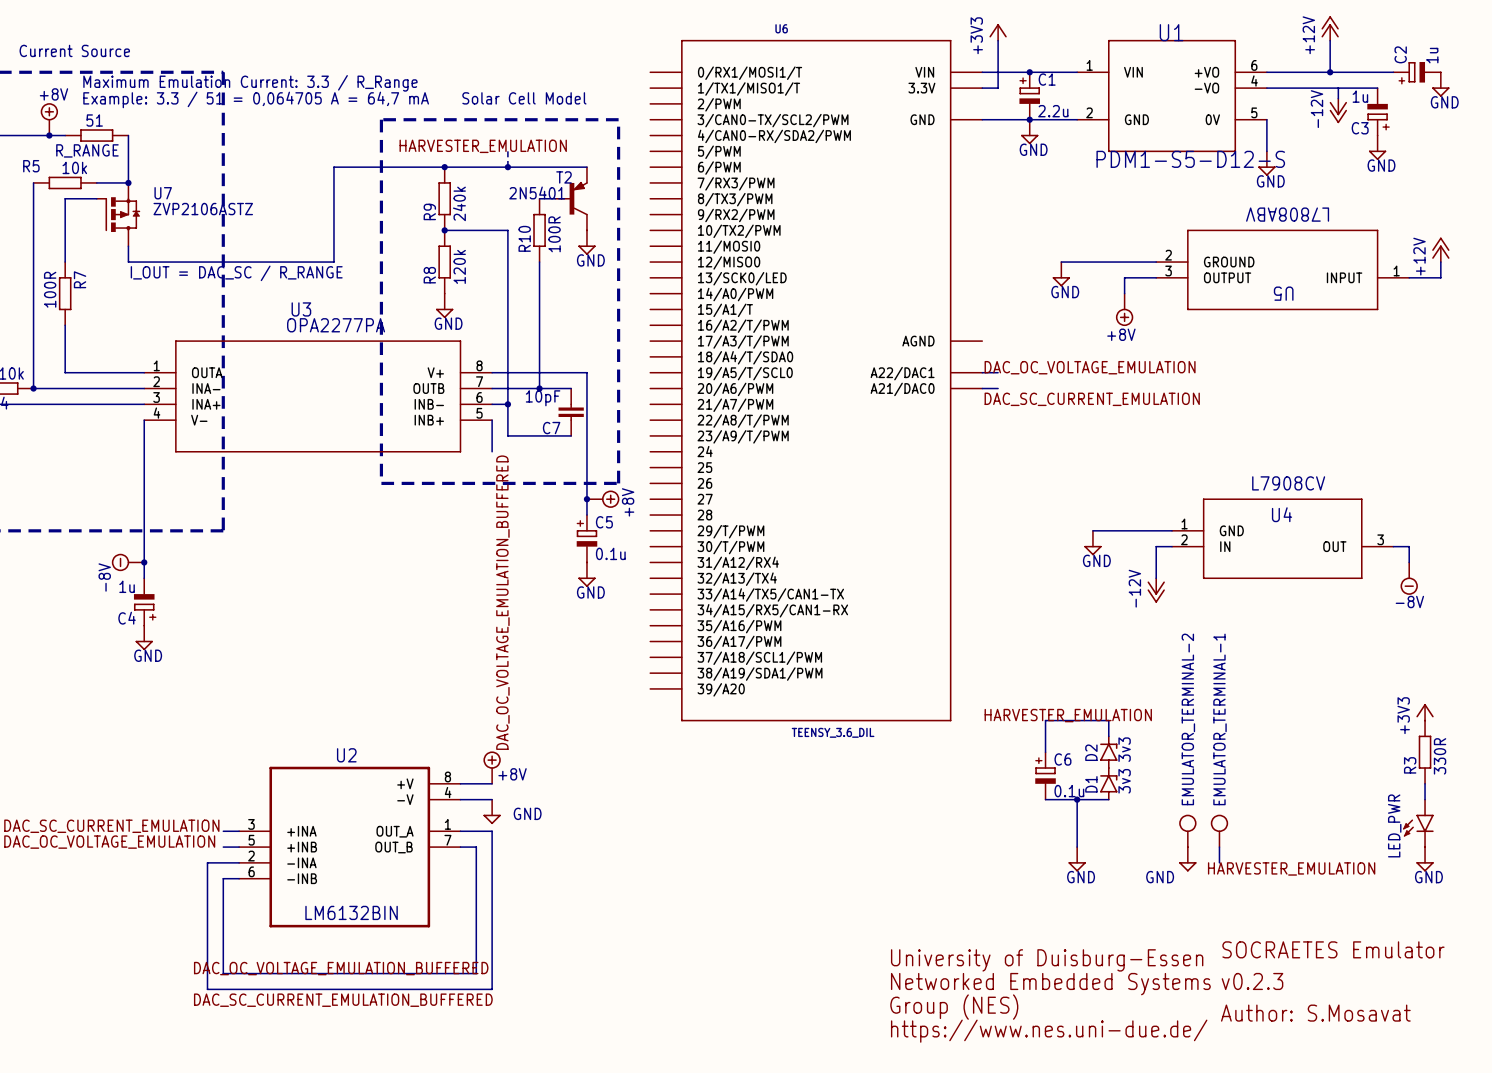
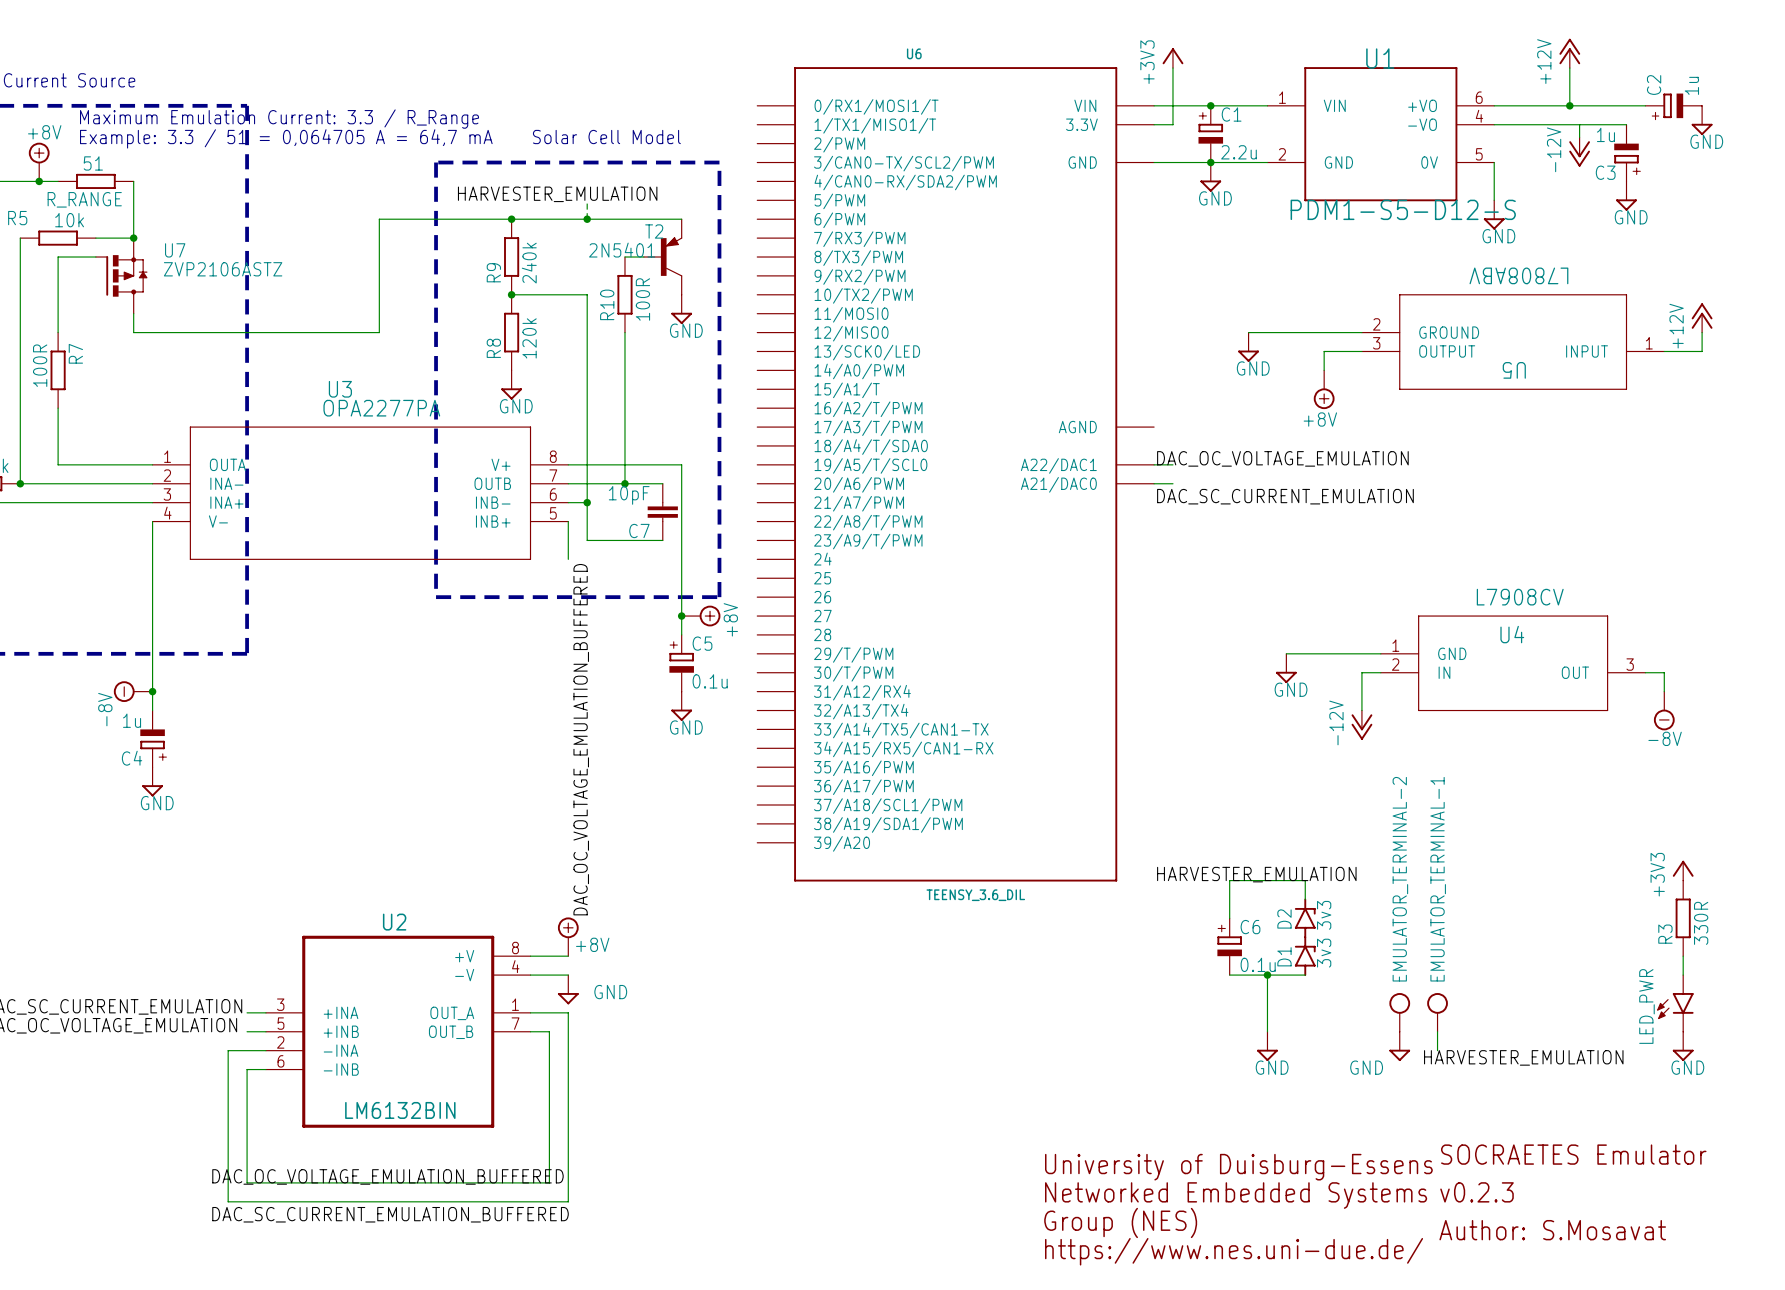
text: I_OUT = DAC_SC / R_RANGE (236, 273) -> none
text: University of Duisburg-Essen (1047, 960) -> University of Duisburg-Essens (1238, 1167)

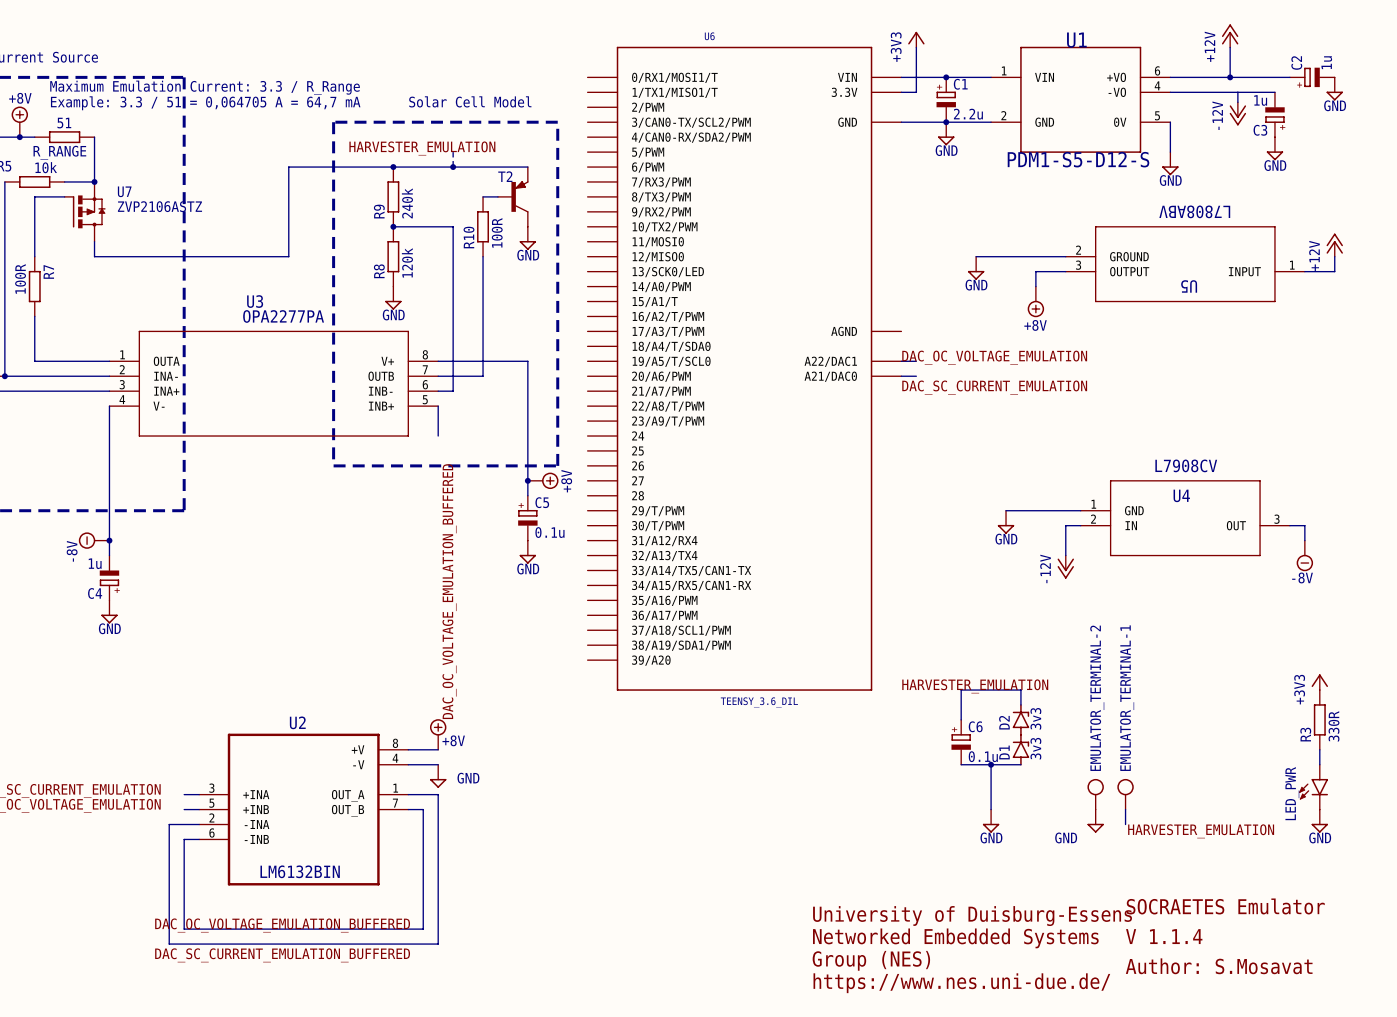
T2 value: 2N5401 (622, 250) -> none
wire: (624, 483) (662, 483) -> none
junction: (624, 483) -> none
wire: (587, 502) (587, 540) (662, 540) -> none
junction: (587, 502) -> none
C7: 10pF (662, 512) -> none
text: v0.2.3 (1477, 1192) -> V 1.1.4 (1164, 936)

